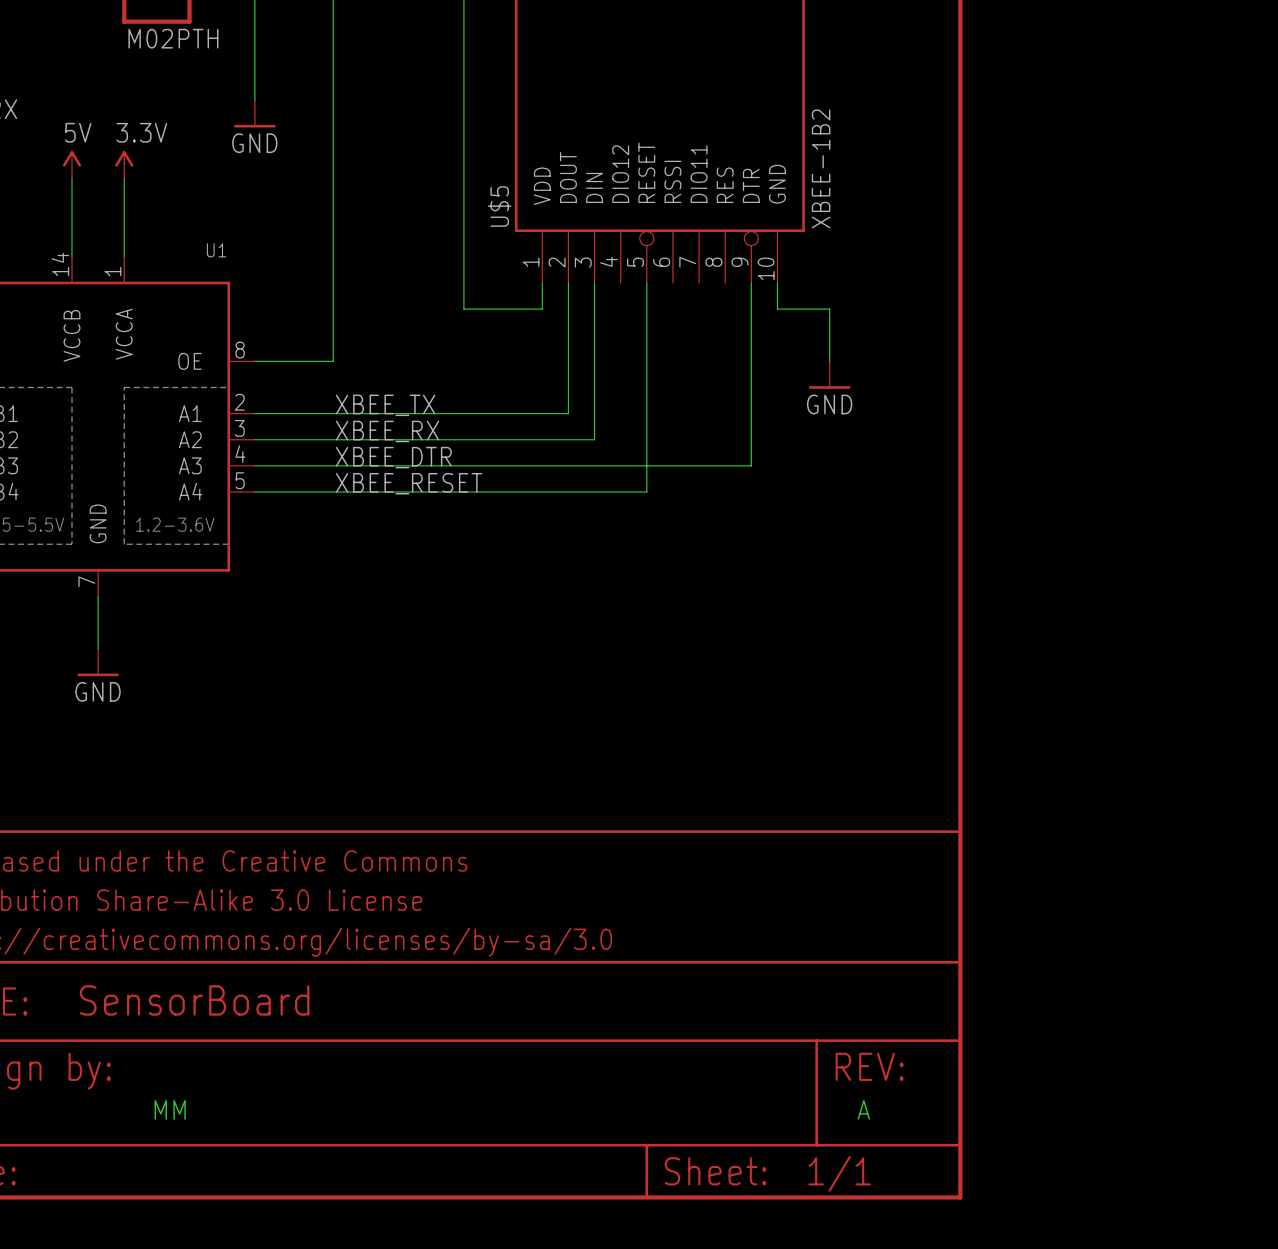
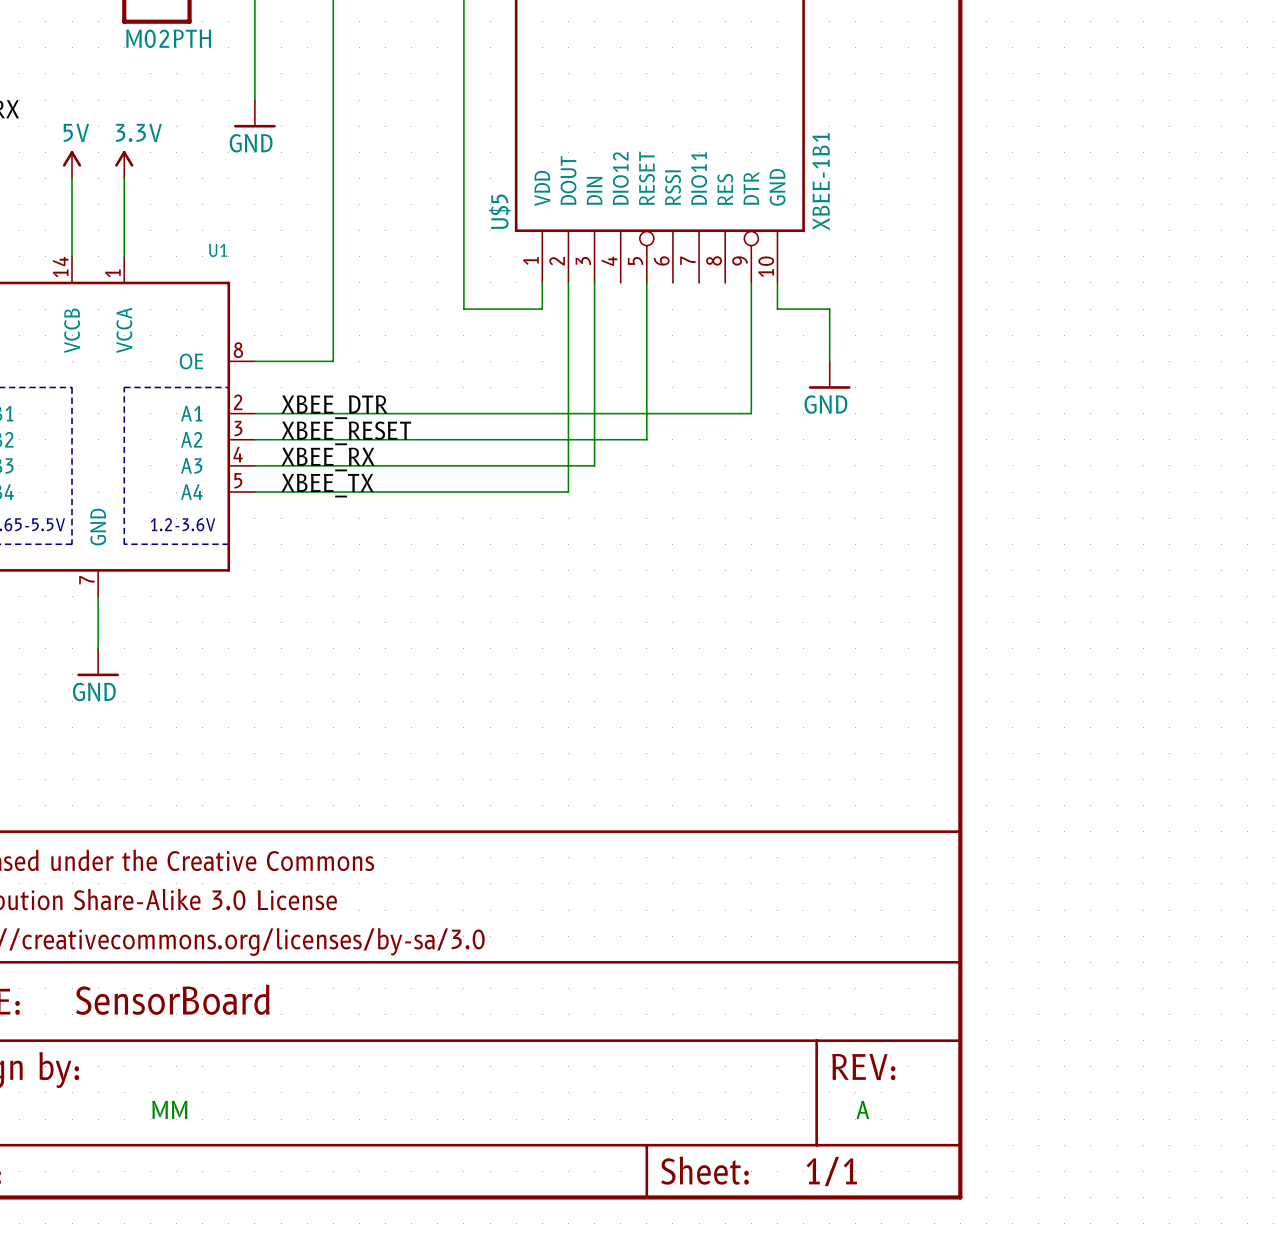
U$5 value: XBEE-1B2 (821, 168) -> XBEE-1B1 (821, 181)
label position: XBEE_TX (385, 405) -> XBEE_TX (327, 485)
wire: (751, 413) (751, 465) (594, 465) -> (751, 413) (568, 413) (568, 492)
label position: XBEE_RX (387, 431) -> XBEE_RX (328, 459)
wire: (646, 439) (646, 492) (568, 492) -> (646, 439) (594, 439) (594, 465)
label position: XBEE_DTR (393, 457) -> XBEE_DTR (334, 407)
label position: XBEE_RESET (409, 483) -> XBEE_RESET (346, 433)

